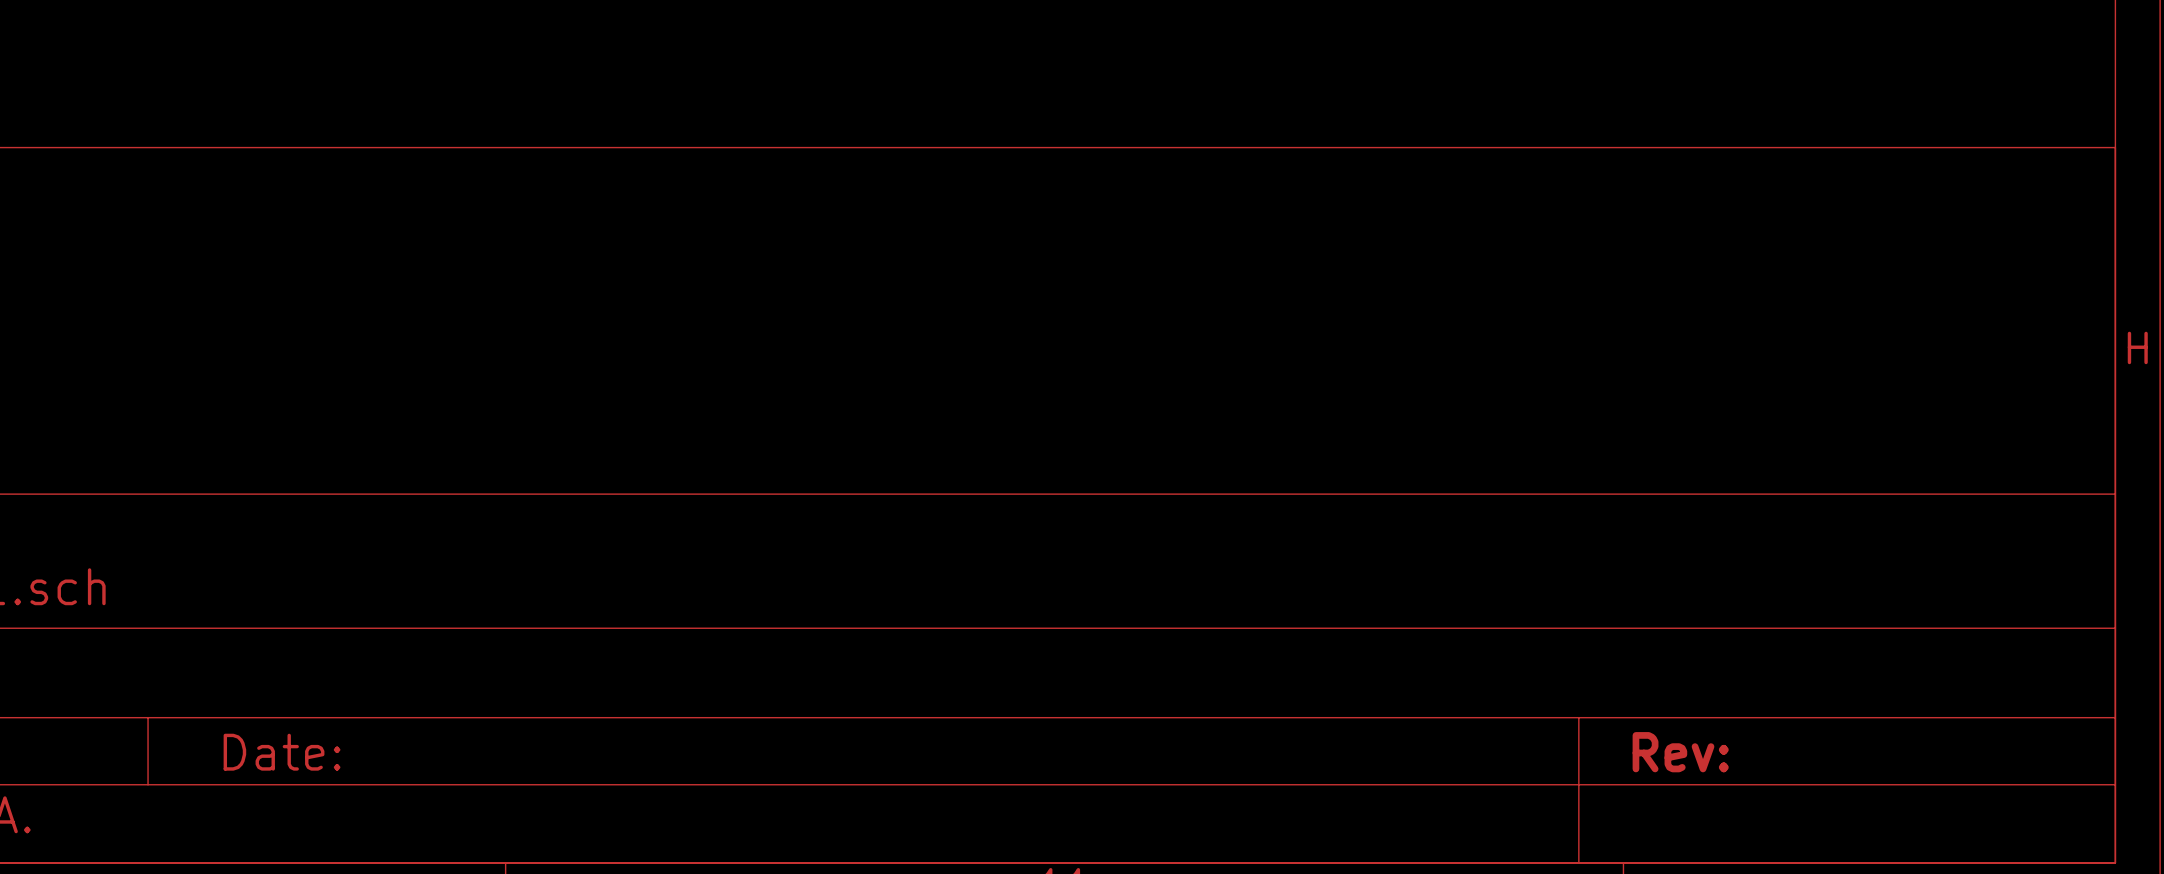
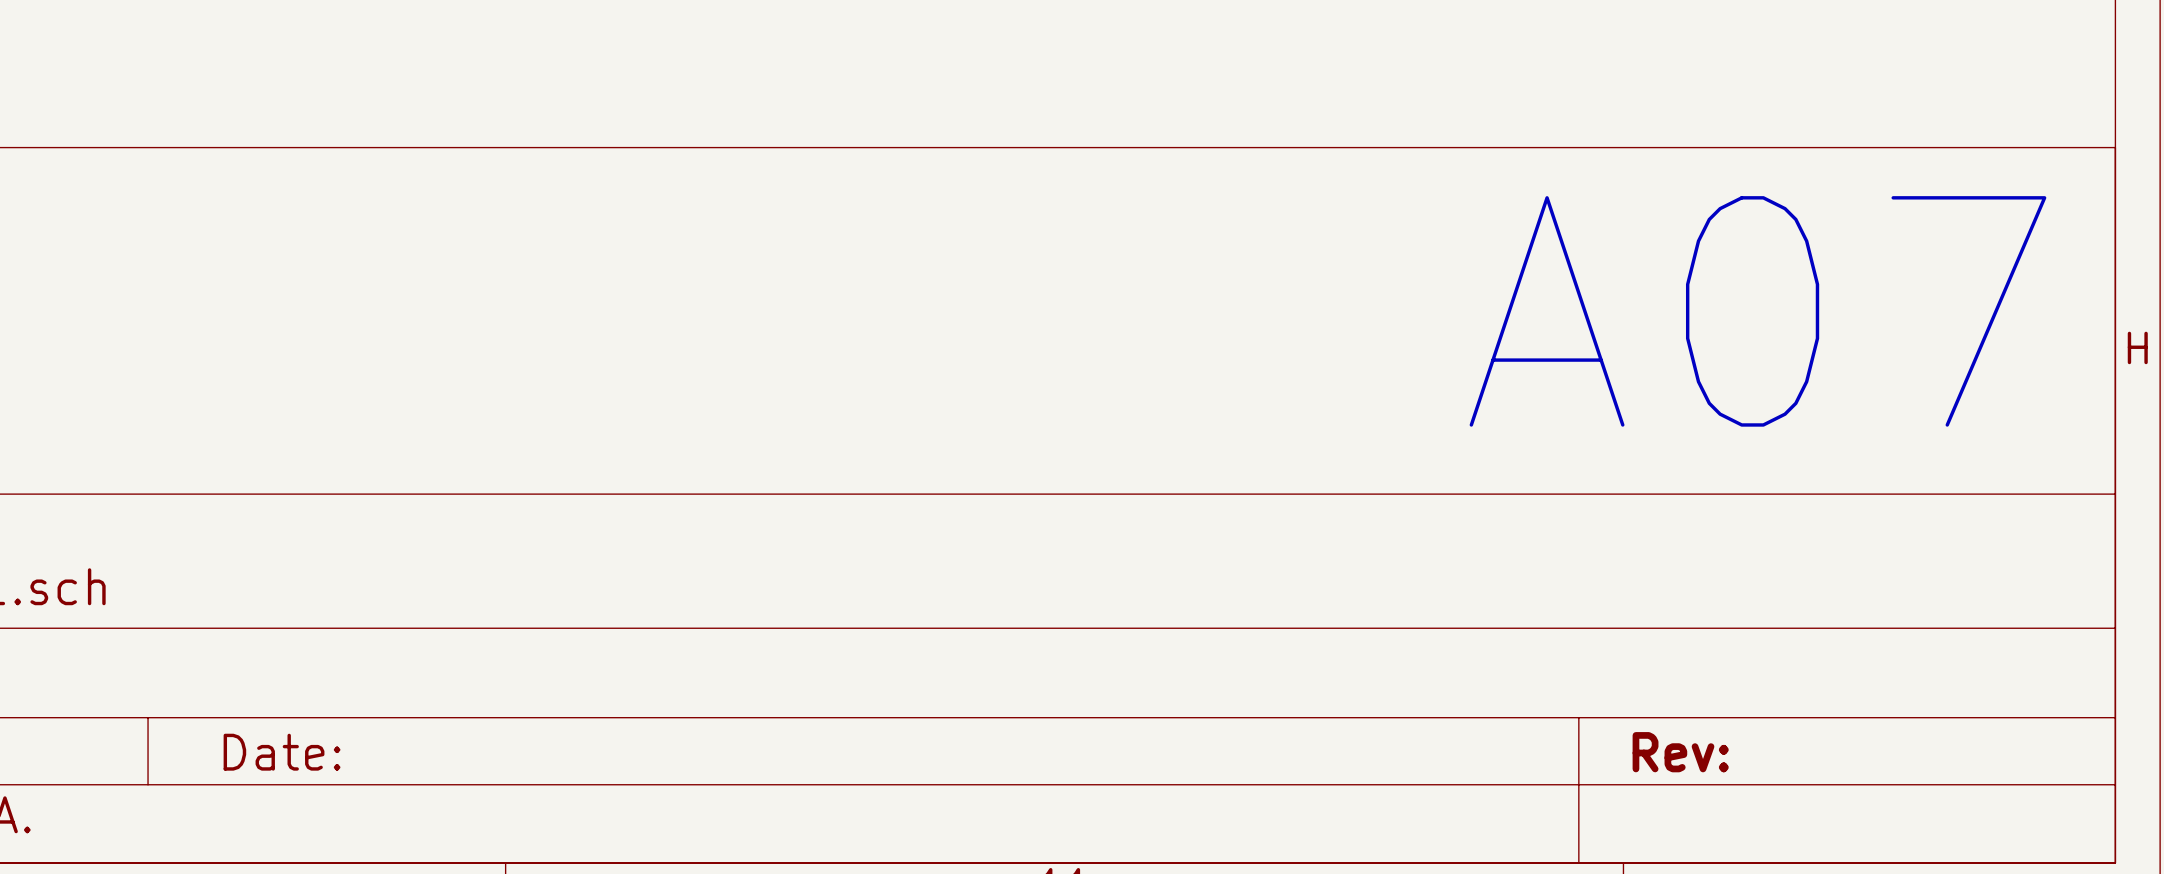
text: none -> A07 (1757, 311)

